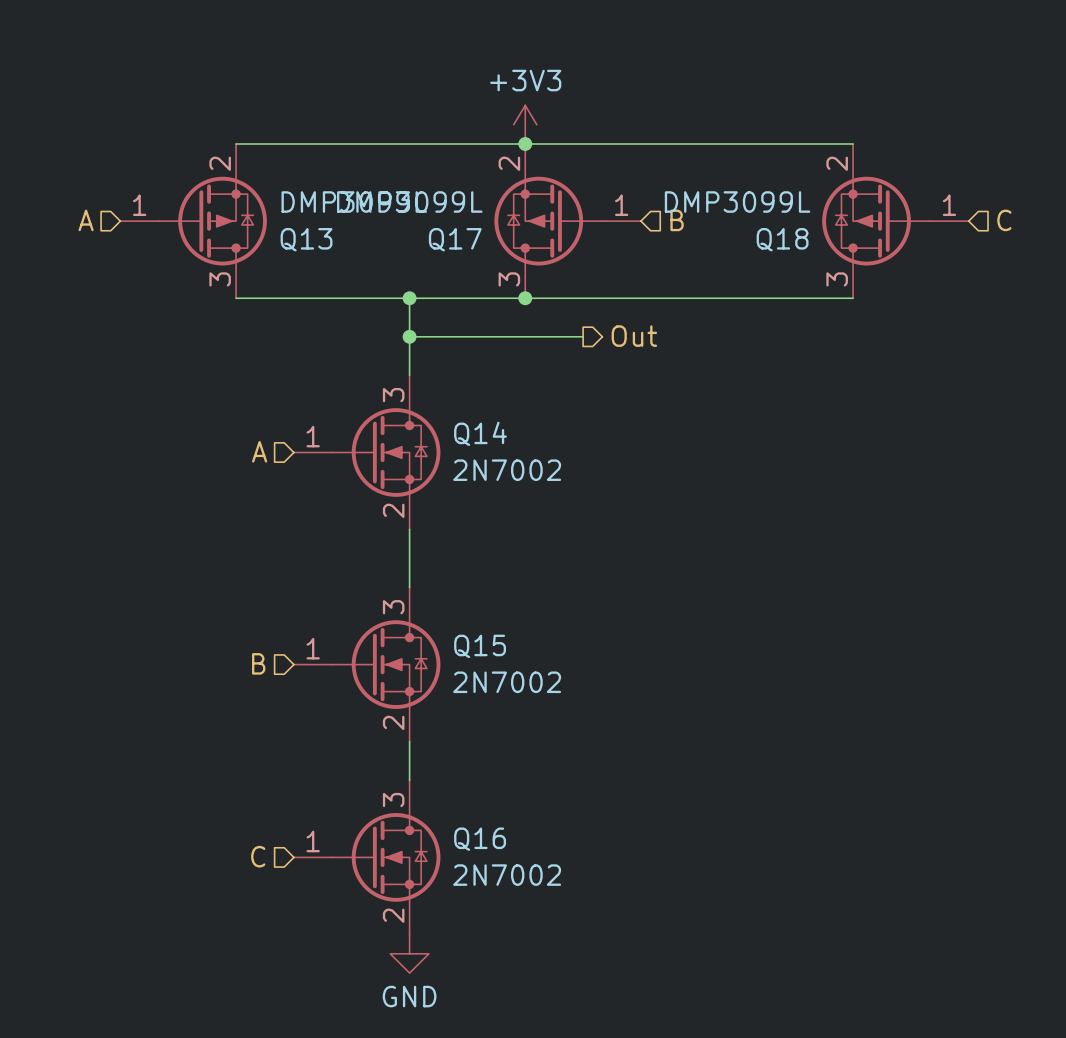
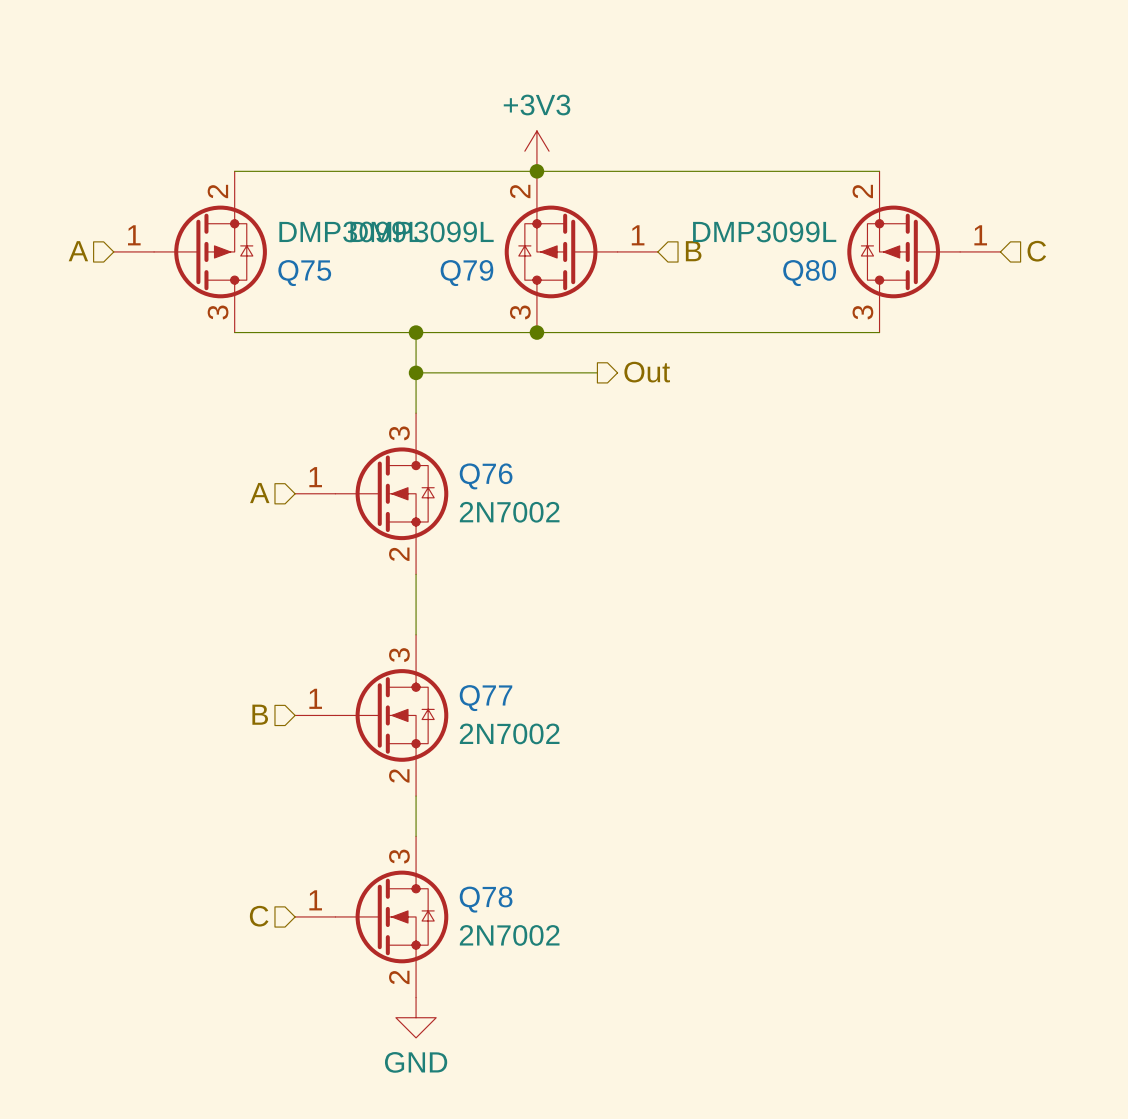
Q13 name: Q13 (306, 239) -> Q75 (304, 273)
Q17 name: Q17 (455, 239) -> Q79 (466, 273)
Q18 name: Q18 (782, 239) -> Q80 (809, 273)
Q14 name: Q14 (480, 433) -> Q76 (486, 476)
Q15 name: Q15 (480, 646) -> Q77 (486, 698)
Q16 name: Q16 (480, 839) -> Q78 (486, 899)

